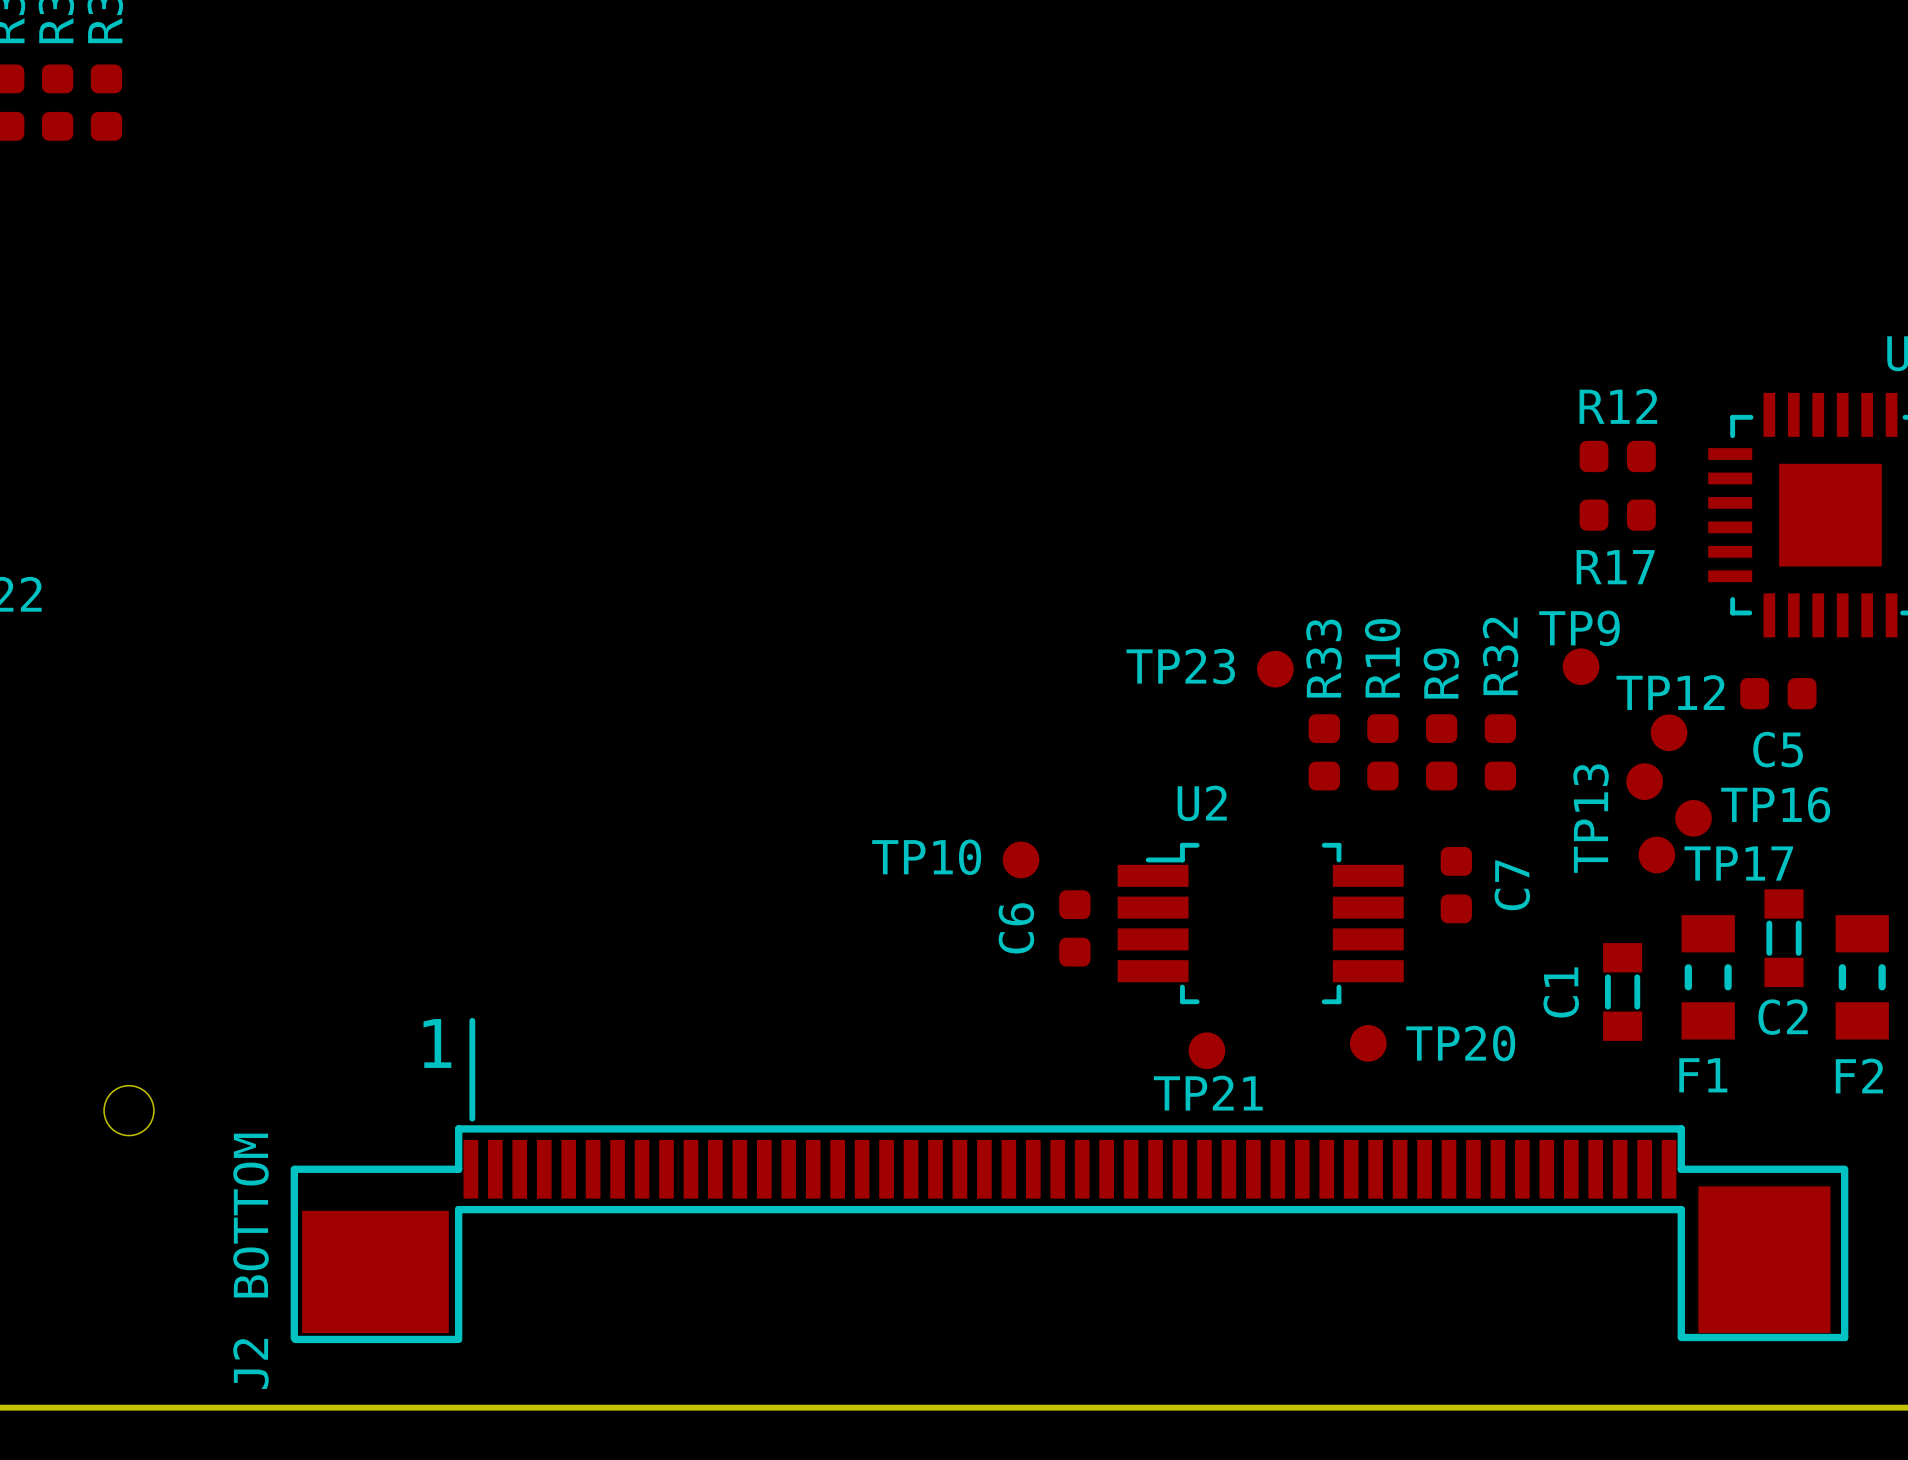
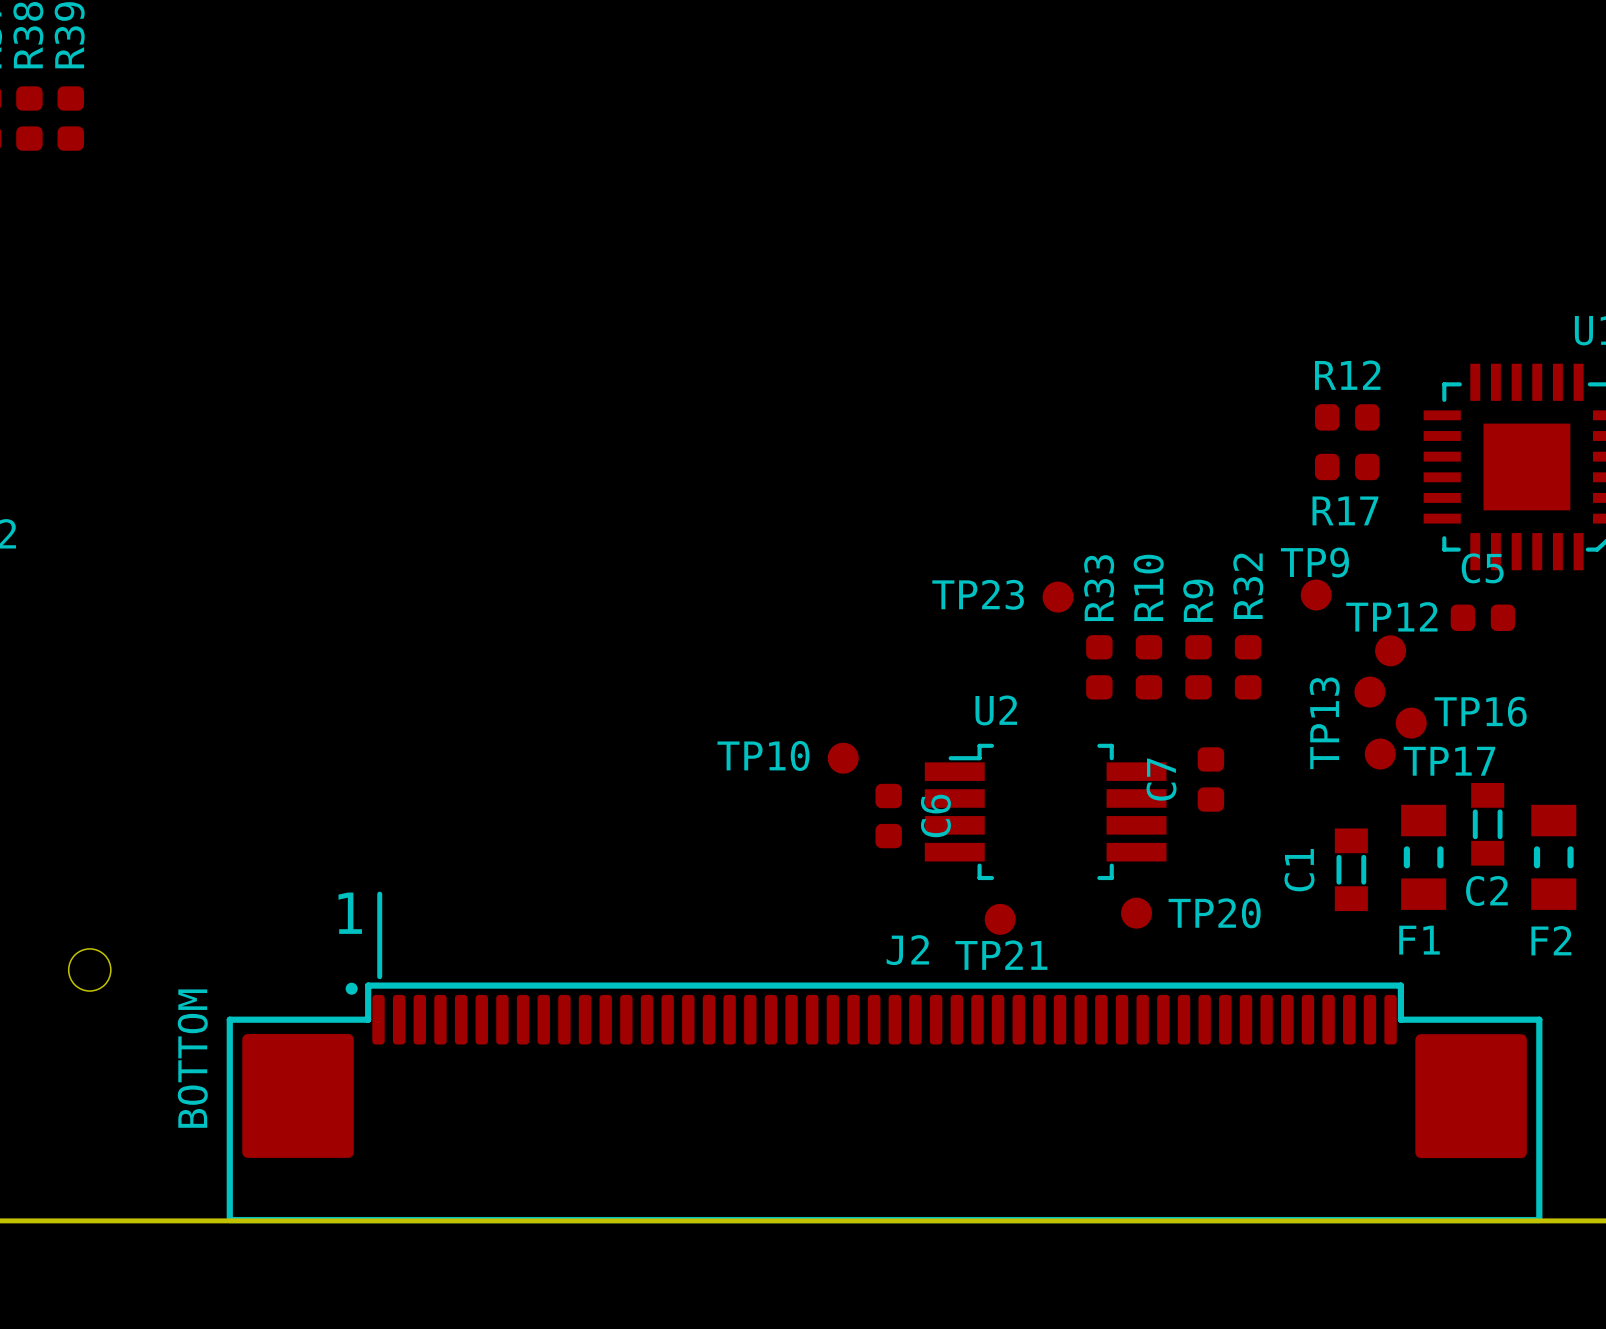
C5 name position: C5 (1778, 749) -> C5 (1482, 568)
C7 name position: C7 (1512, 885) -> C7 (1161, 779)
C6 name position: C6 (1016, 928) -> C6 (935, 815)
J2 footprint: [290, 1125, 1849, 1344] -> [226, 982, 1543, 1224]
J2 name position: J2 (251, 1363) -> J2 (907, 950)

